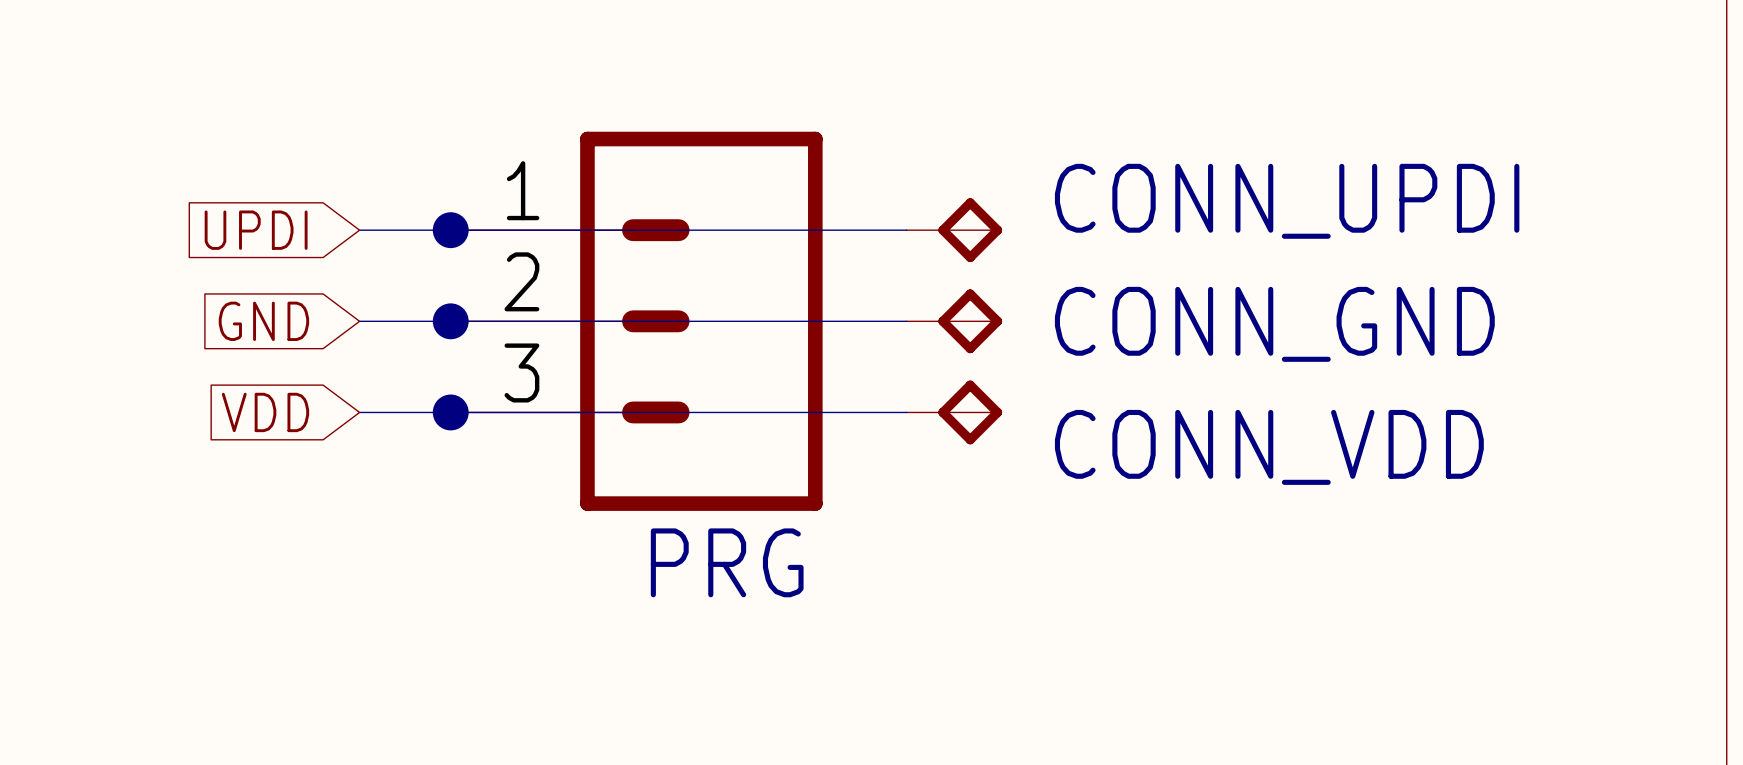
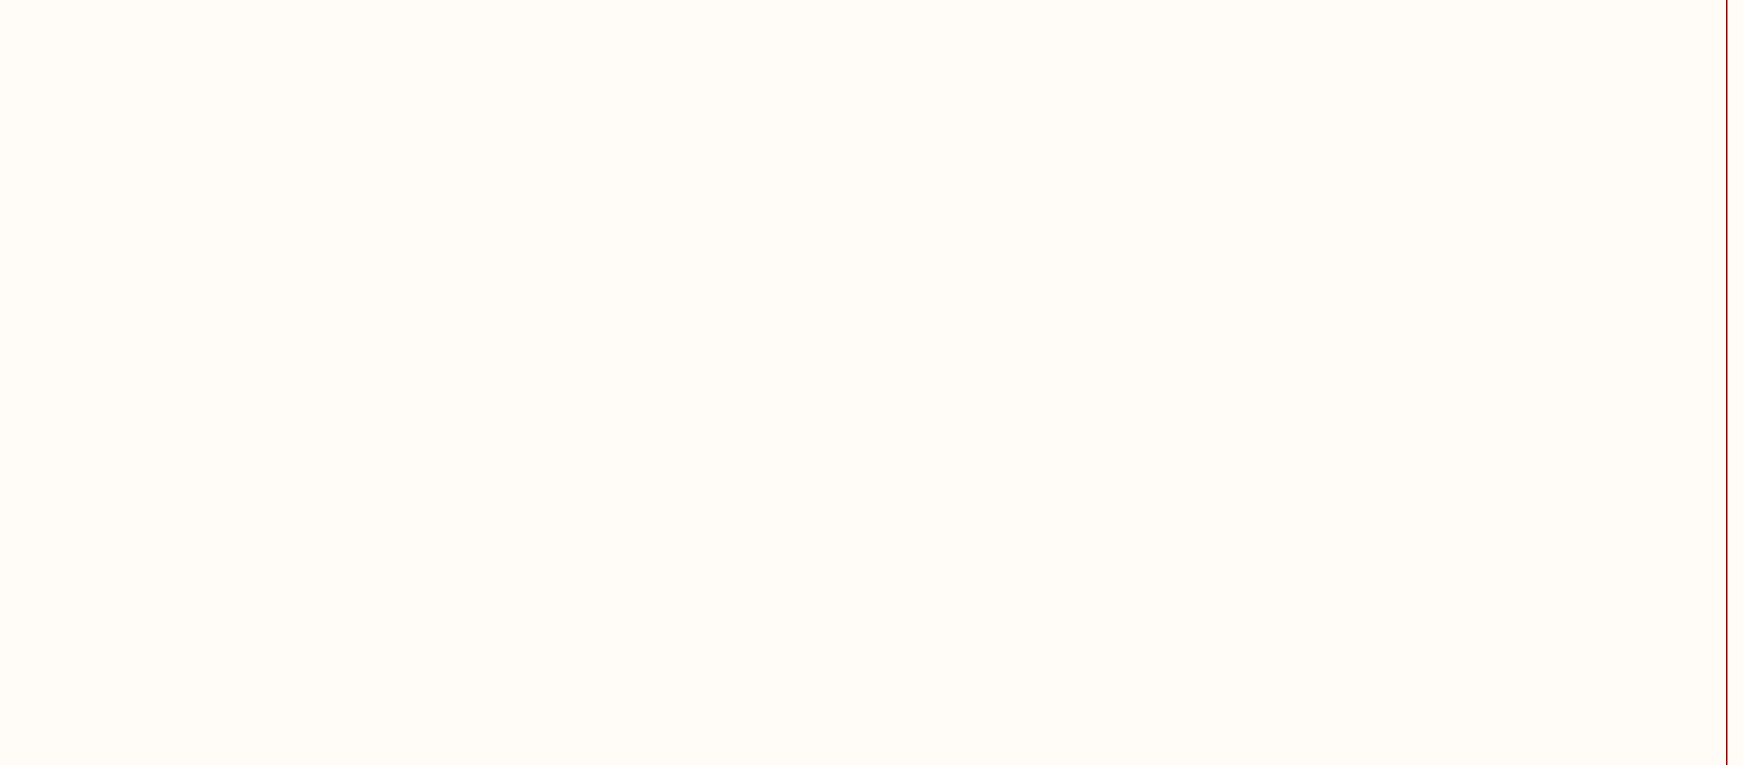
global label: UPDI (256, 230) -> none
wire: (359, 230) (906, 230) -> none
junction: (450, 230) -> none
CONN_UPDI: (954, 230) -> none
global label: GND (263, 321) -> none
wire: (359, 321) (906, 321) -> none
junction: (450, 321) -> none
PRG: (636, 321) -> none
CONN_GND: (954, 321) -> none
global label: VDD (265, 412) -> none
wire: (359, 412) (906, 412) -> none
junction: (450, 412) -> none
CONN_VDD: (954, 412) -> none

